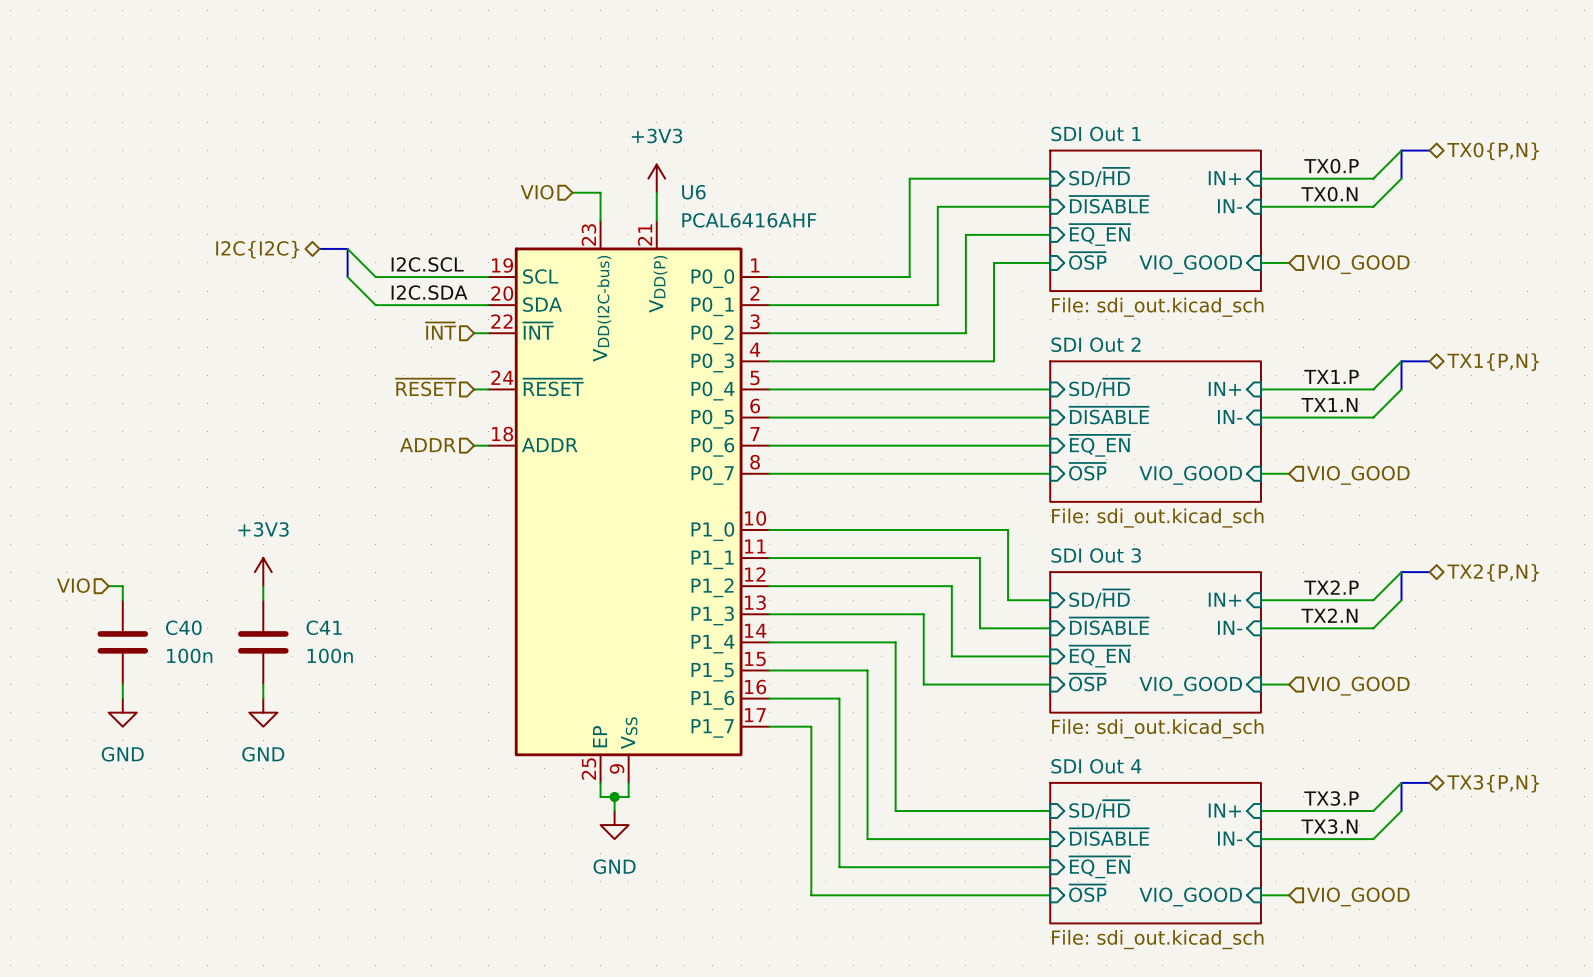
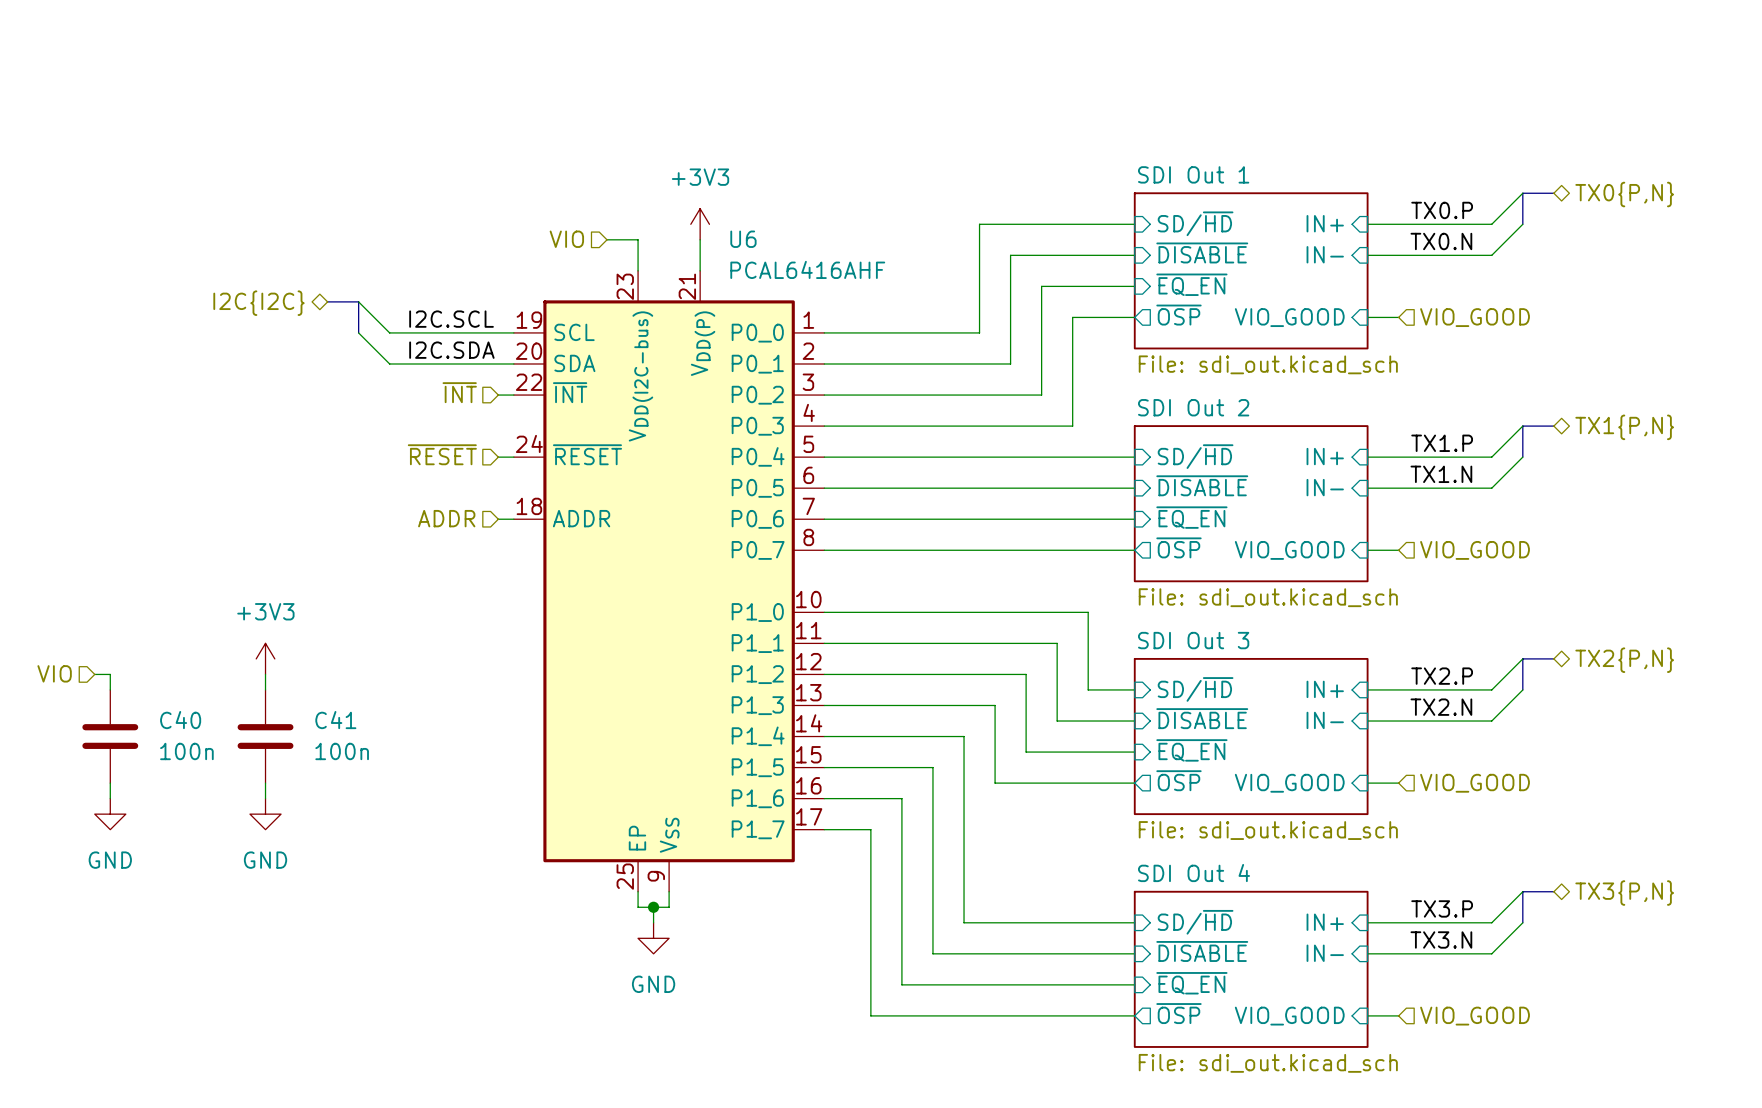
sheet pin shape: input (1087, 260) -> output (1178, 315)
sheet pin shape: input (1087, 471) -> output (1178, 547)
sheet pin shape: input (1087, 682) -> output (1178, 780)
sheet pin shape: input (1087, 893) -> output (1178, 1013)

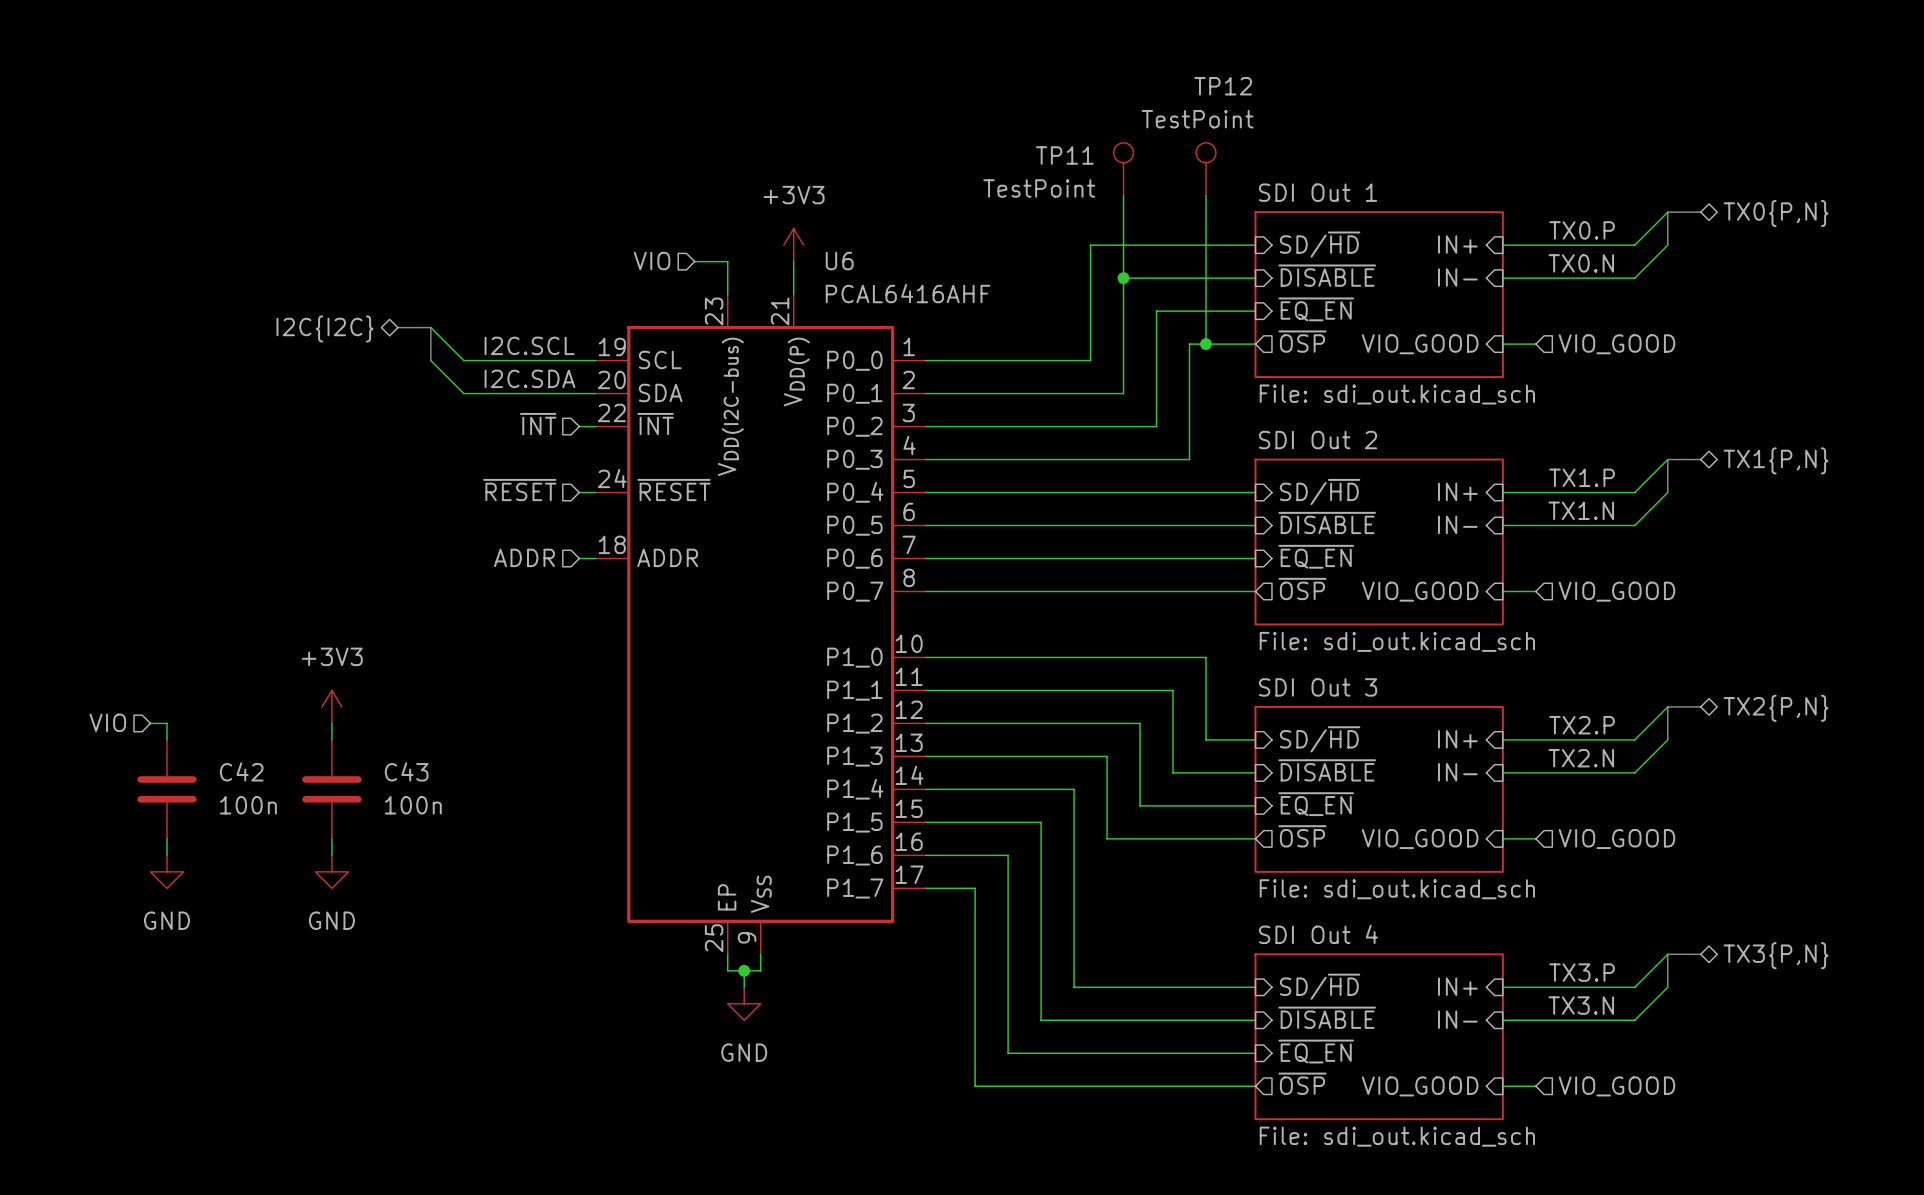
TP11: none -> TestPoint (1123, 169)
TP12: none -> TestPoint (1205, 169)
wire: none -> (1123, 195) (1123, 278)
wire: none -> (1205, 195) (1205, 344)
junction: none -> (1123, 278)
junction: none -> (1205, 344)
C40 name: C40 (180, 720) -> C42 (241, 771)
C41 name: C41 (335, 720) -> C43 (406, 771)

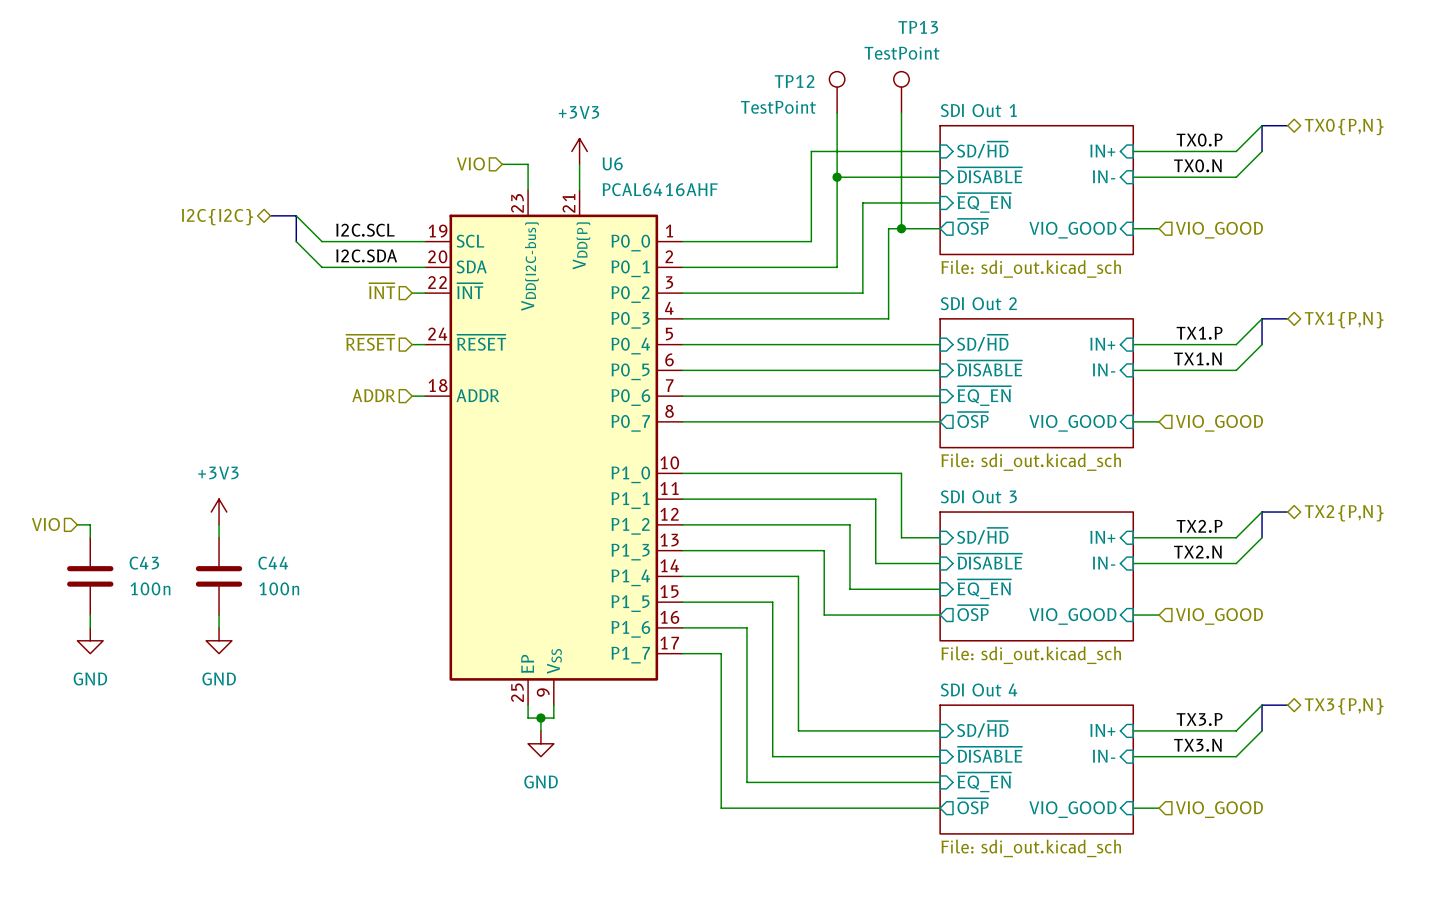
TP12 name: TP12 (1223, 86) -> TP13 (918, 27)
TP11 name: TP11 (1064, 155) -> TP12 (794, 81)
C42 name: C42 (241, 771) -> C43 (144, 563)
C43 name: C43 (406, 771) -> C44 (273, 563)

